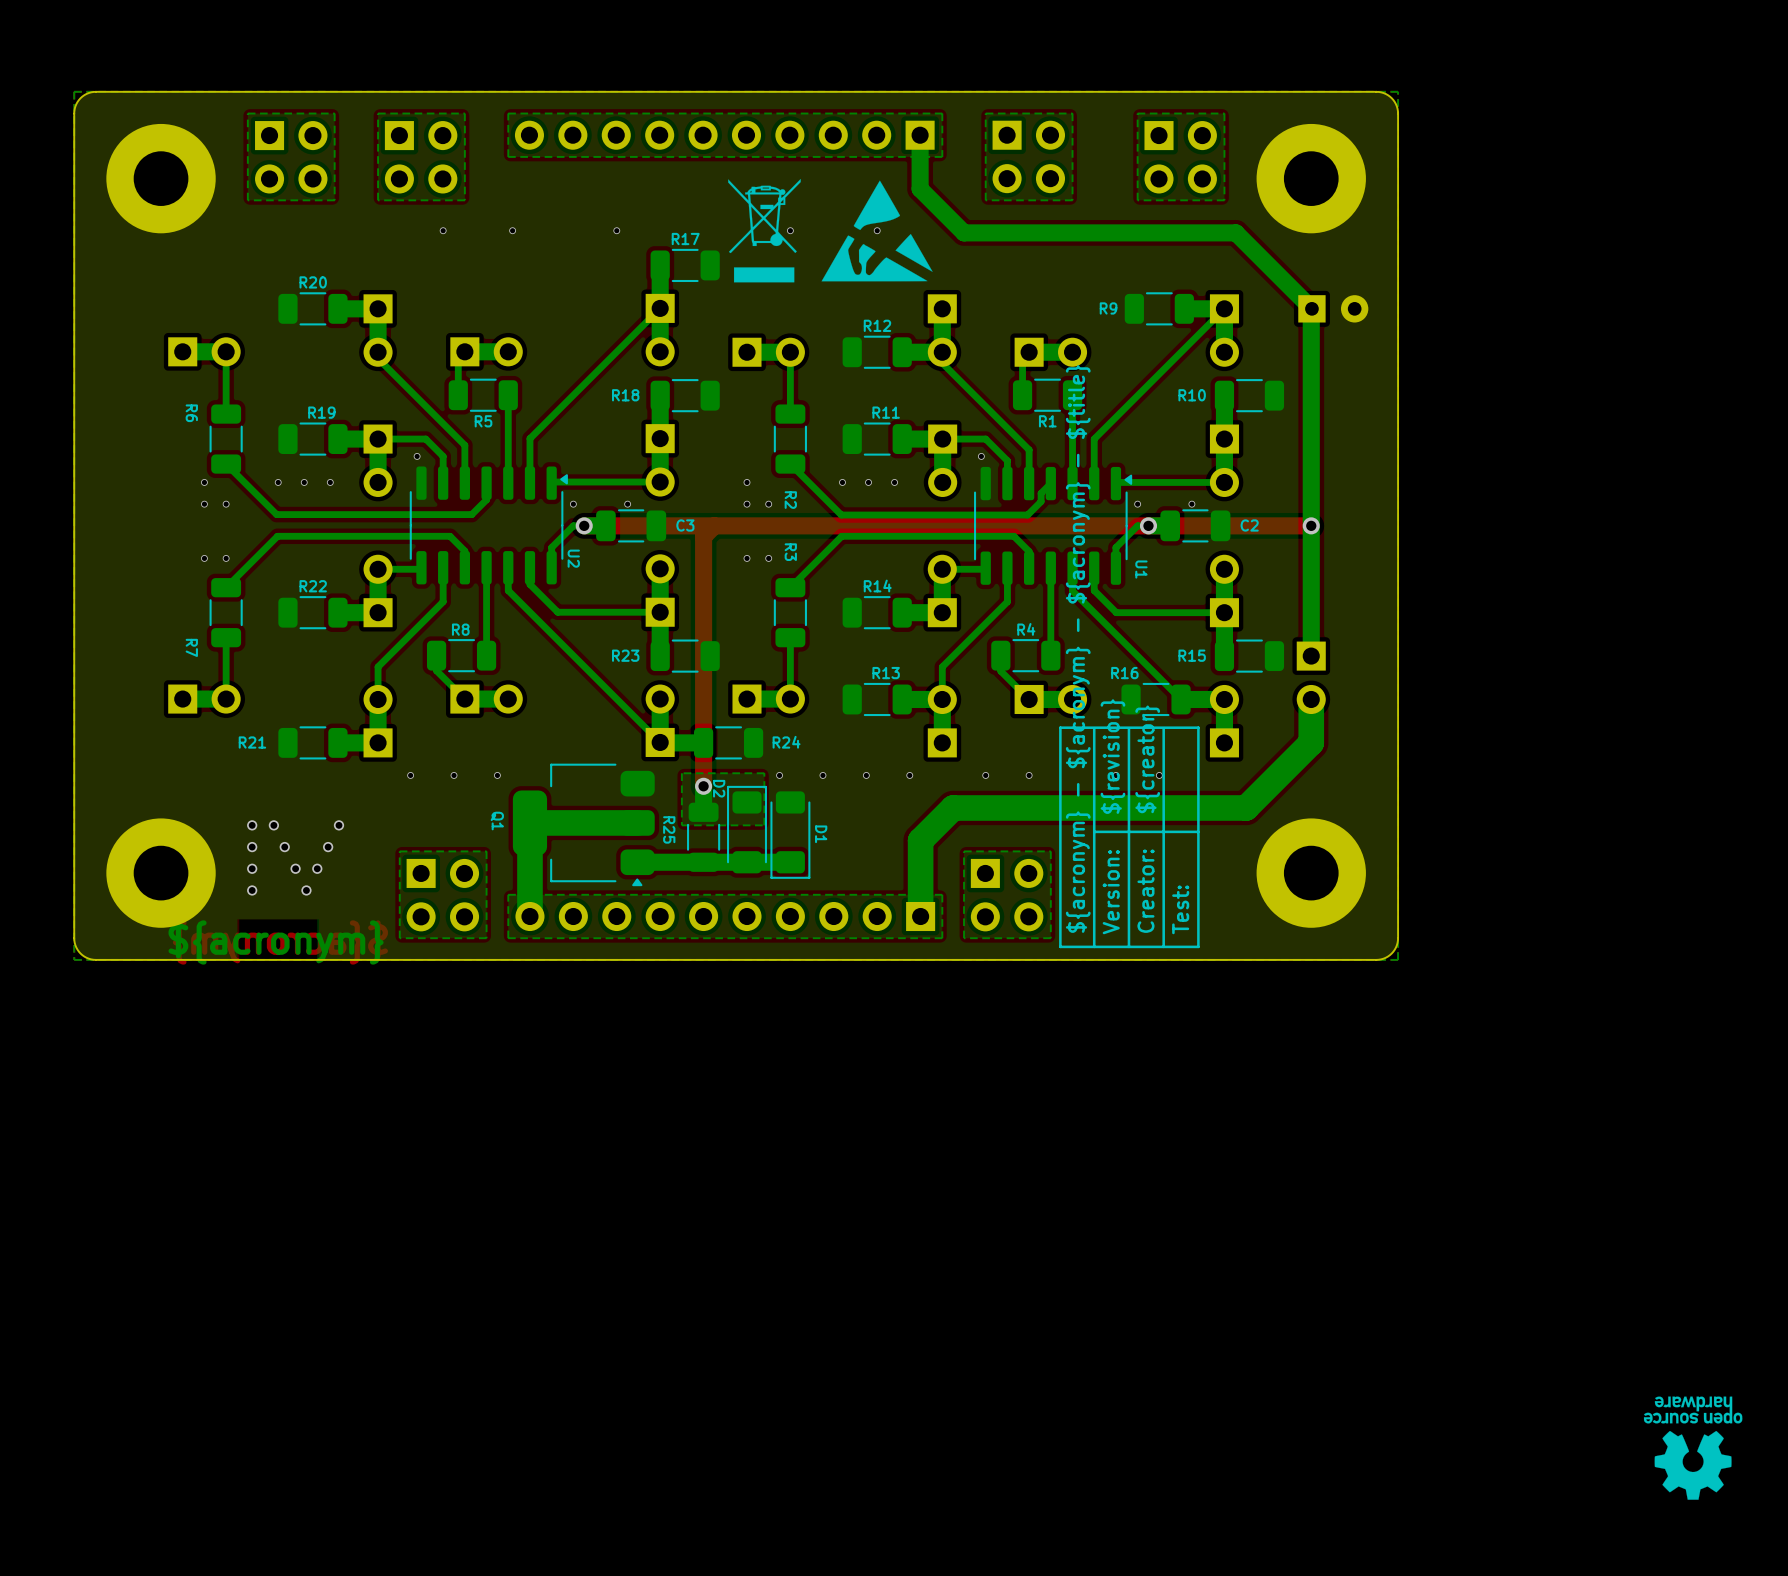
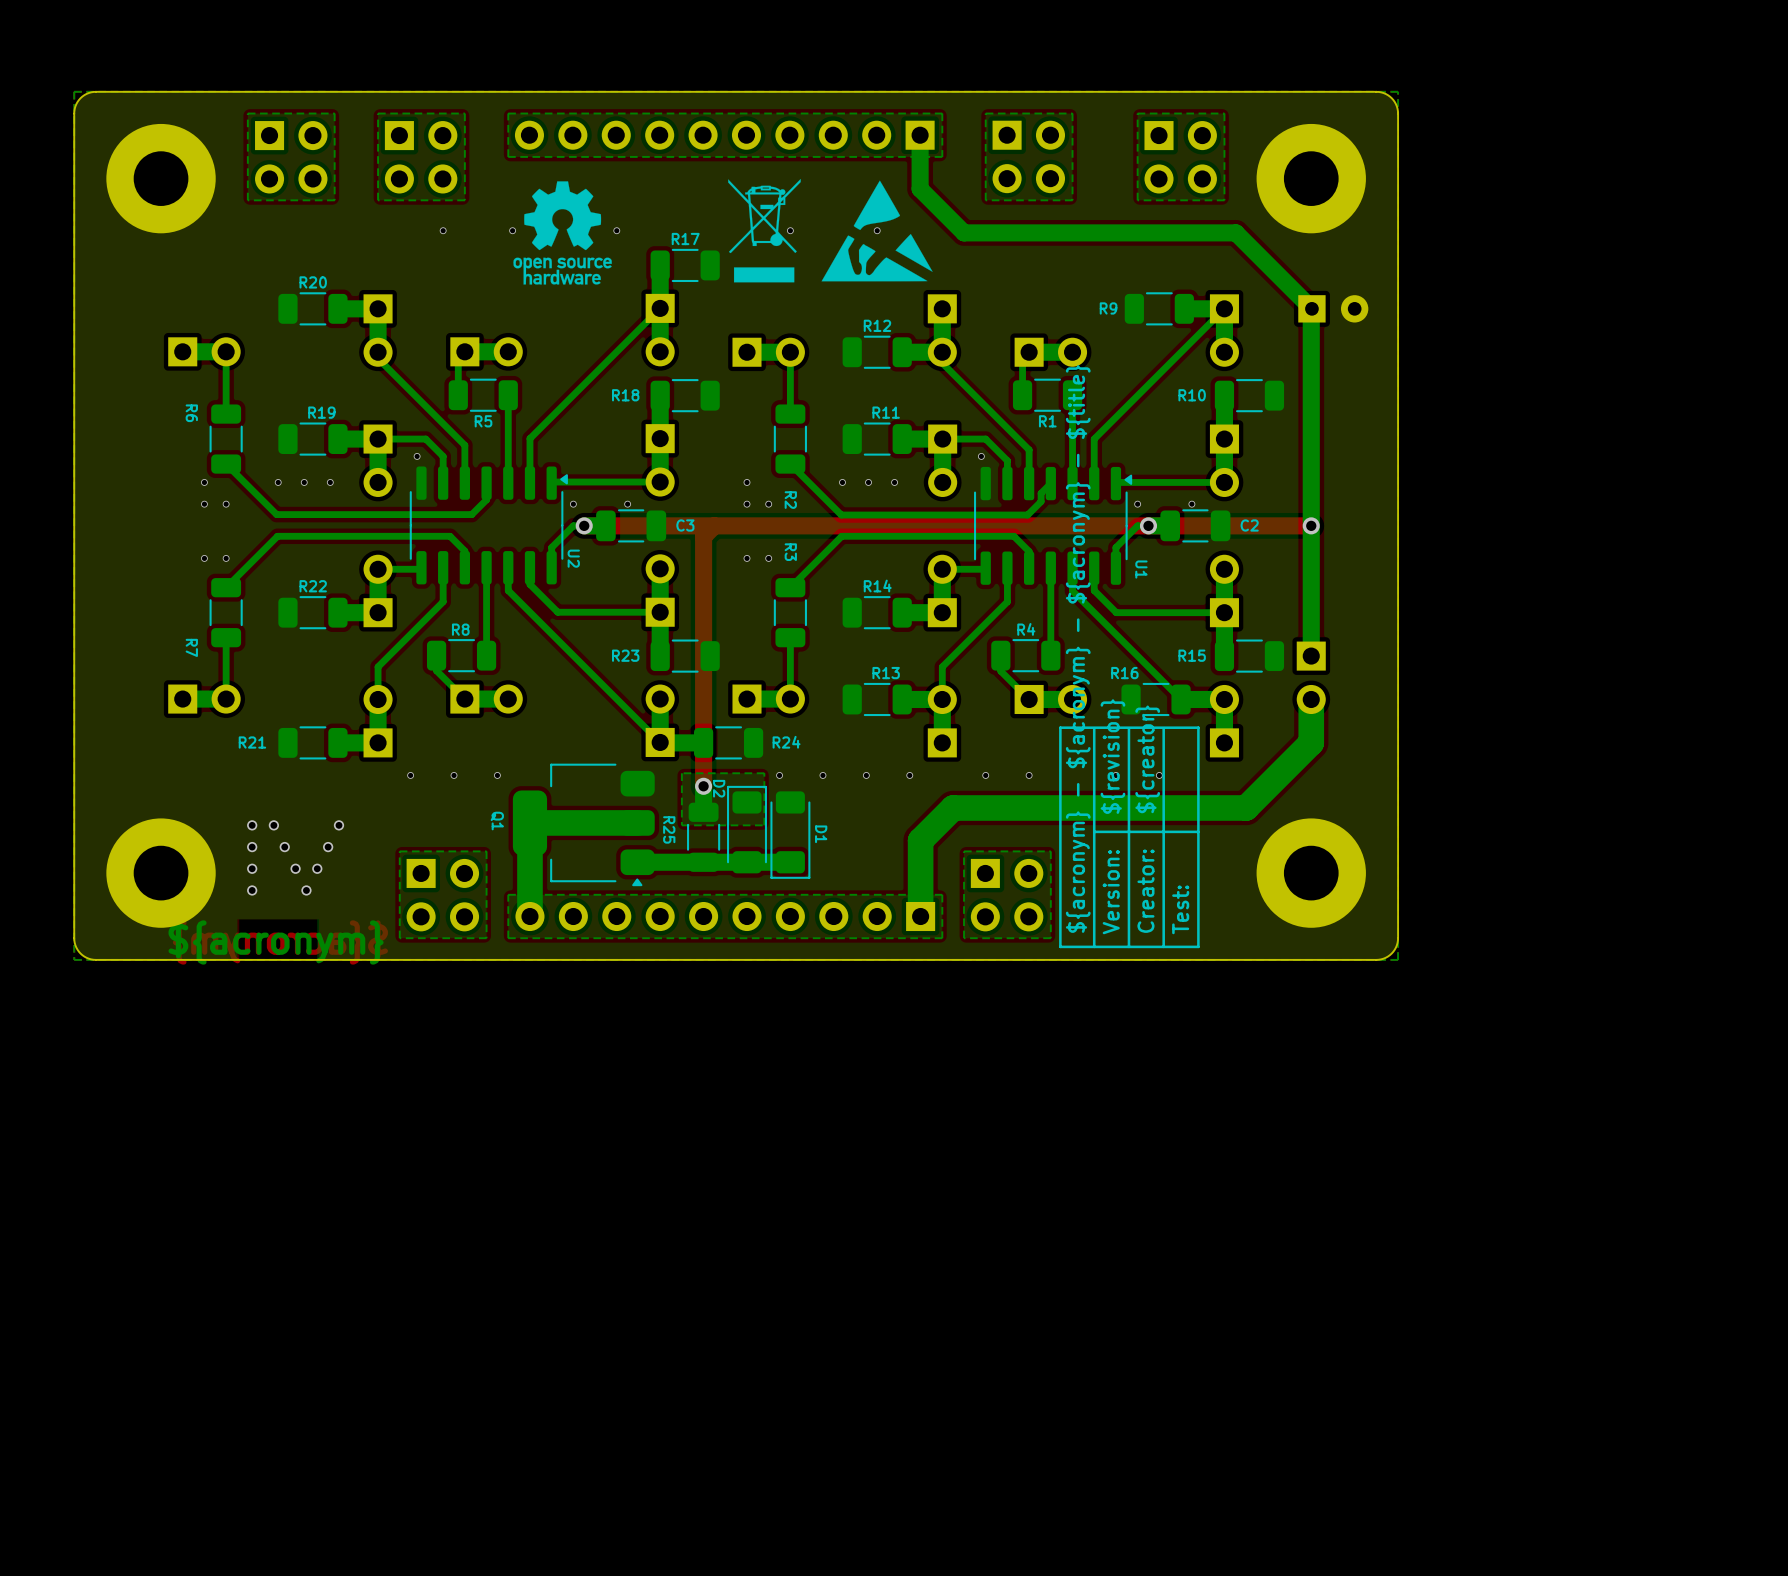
drawing: none -> [513, 181, 612, 285]
drawing: [1643, 1396, 1743, 1500] -> none

